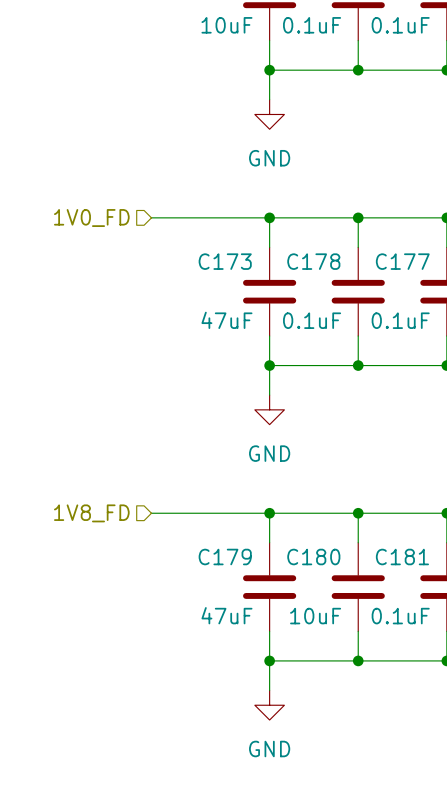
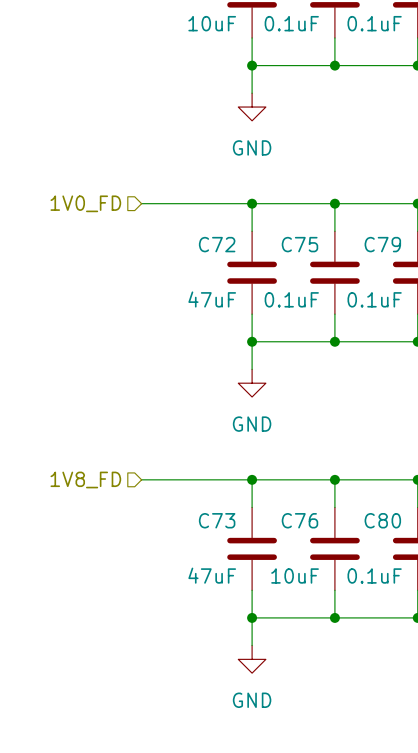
C173 name: C173 (225, 261) -> C72 (217, 244)
C178 name: C178 (313, 261) -> C75 (299, 244)
C177 name: C177 (402, 261) -> C79 (382, 244)
C179 name: C179 (225, 557) -> C73 (217, 520)
C180 name: C180 (313, 557) -> C76 (299, 520)
C181 name: C181 (402, 557) -> C80 (382, 520)

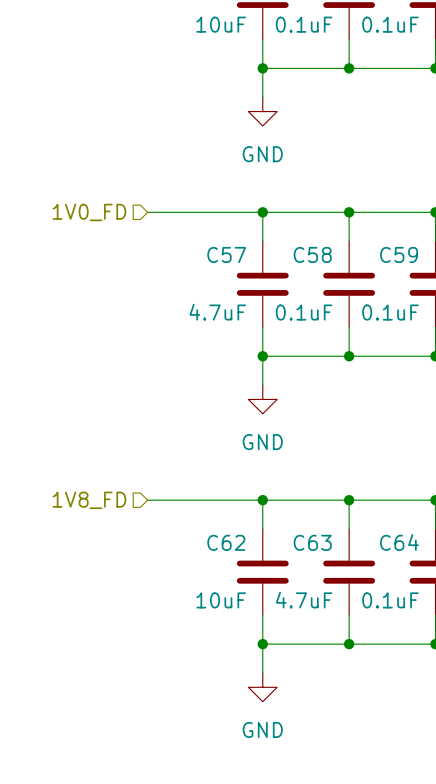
C72 name: C72 (217, 244) -> C57 (226, 254)
C75 name: C75 (299, 244) -> C58 (312, 254)
C79 name: C79 (382, 244) -> C59 (399, 254)
C72 value: 47uF (212, 299) -> 4.7uF (217, 312)
C73 name: C73 (217, 520) -> C62 (226, 542)
C76 name: C76 (299, 520) -> C63 (312, 542)
C80 name: C80 (382, 520) -> C64 (399, 542)
C73 value: 47uF (212, 575) -> 10uF (221, 600)
C76 value: 10uF (295, 575) -> 4.7uF (304, 600)

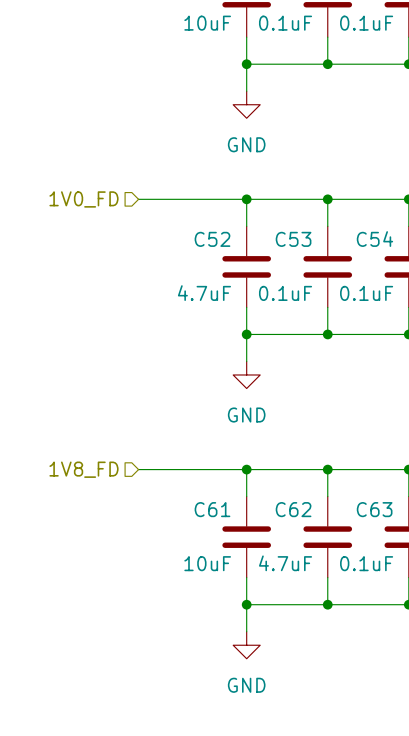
C57 name: C57 (226, 254) -> C52 (212, 239)
C58 name: C58 (312, 254) -> C53 (293, 239)
C59 name: C59 (399, 254) -> C54 (374, 239)
C62 name: C62 (226, 542) -> C61 (212, 509)
C63 name: C63 (312, 542) -> C62 (293, 509)
C64 name: C64 (399, 542) -> C63 (374, 509)

